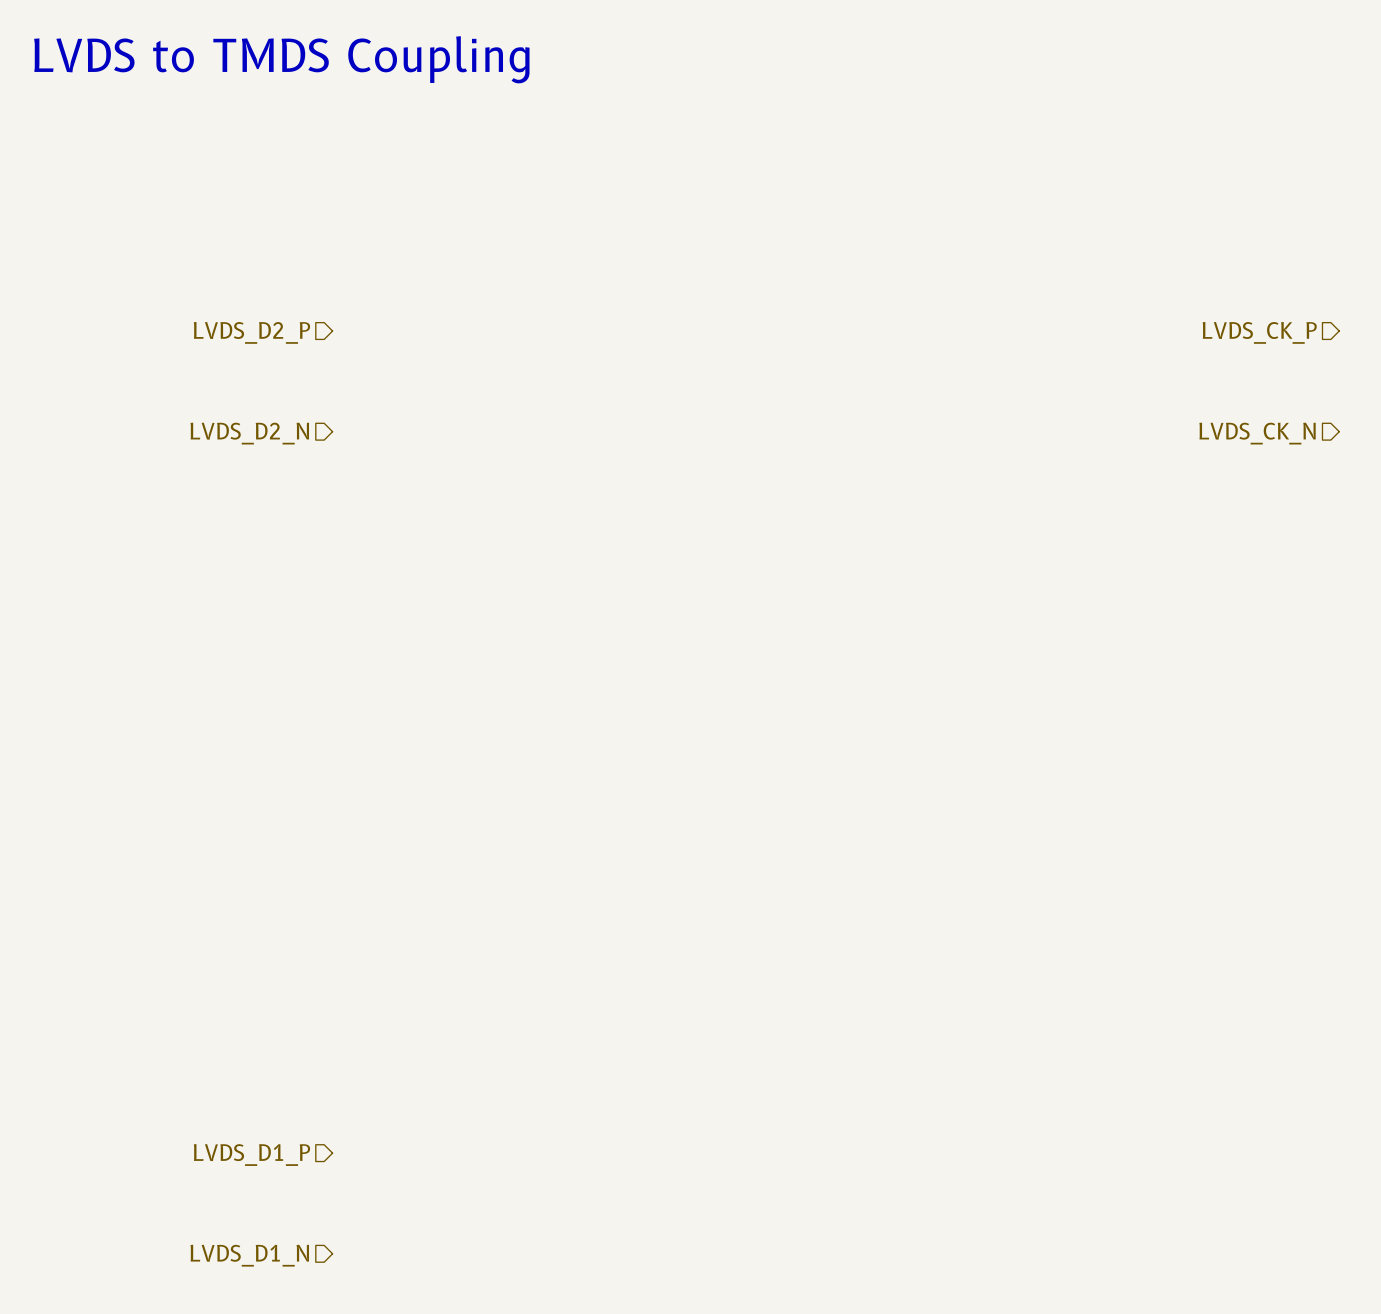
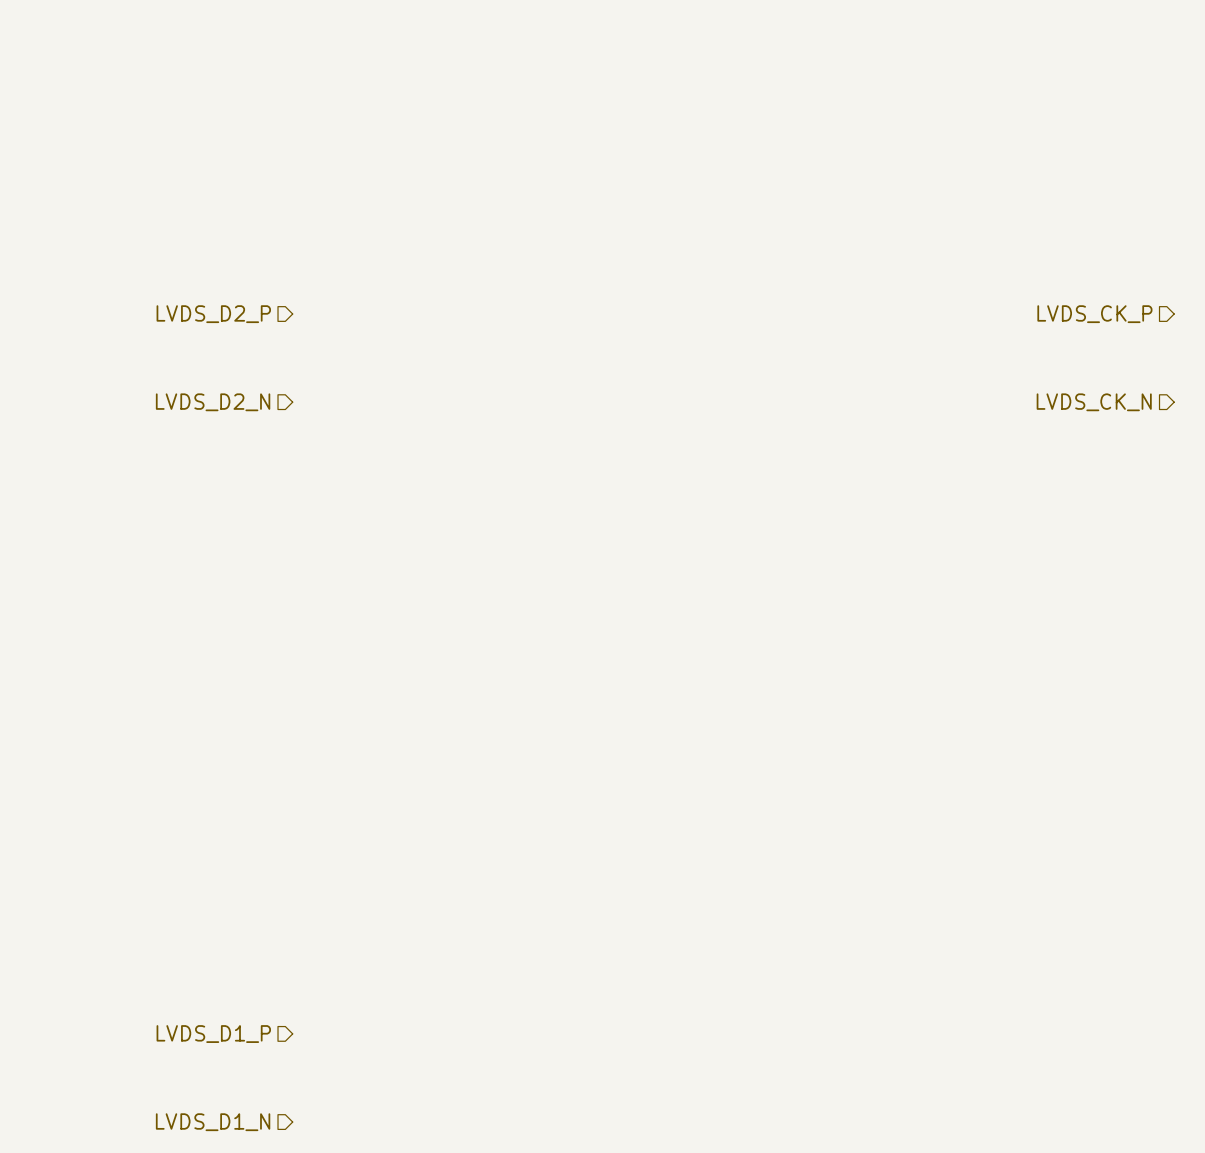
text: LVDS to TMDS Coupling (281, 59) -> none

